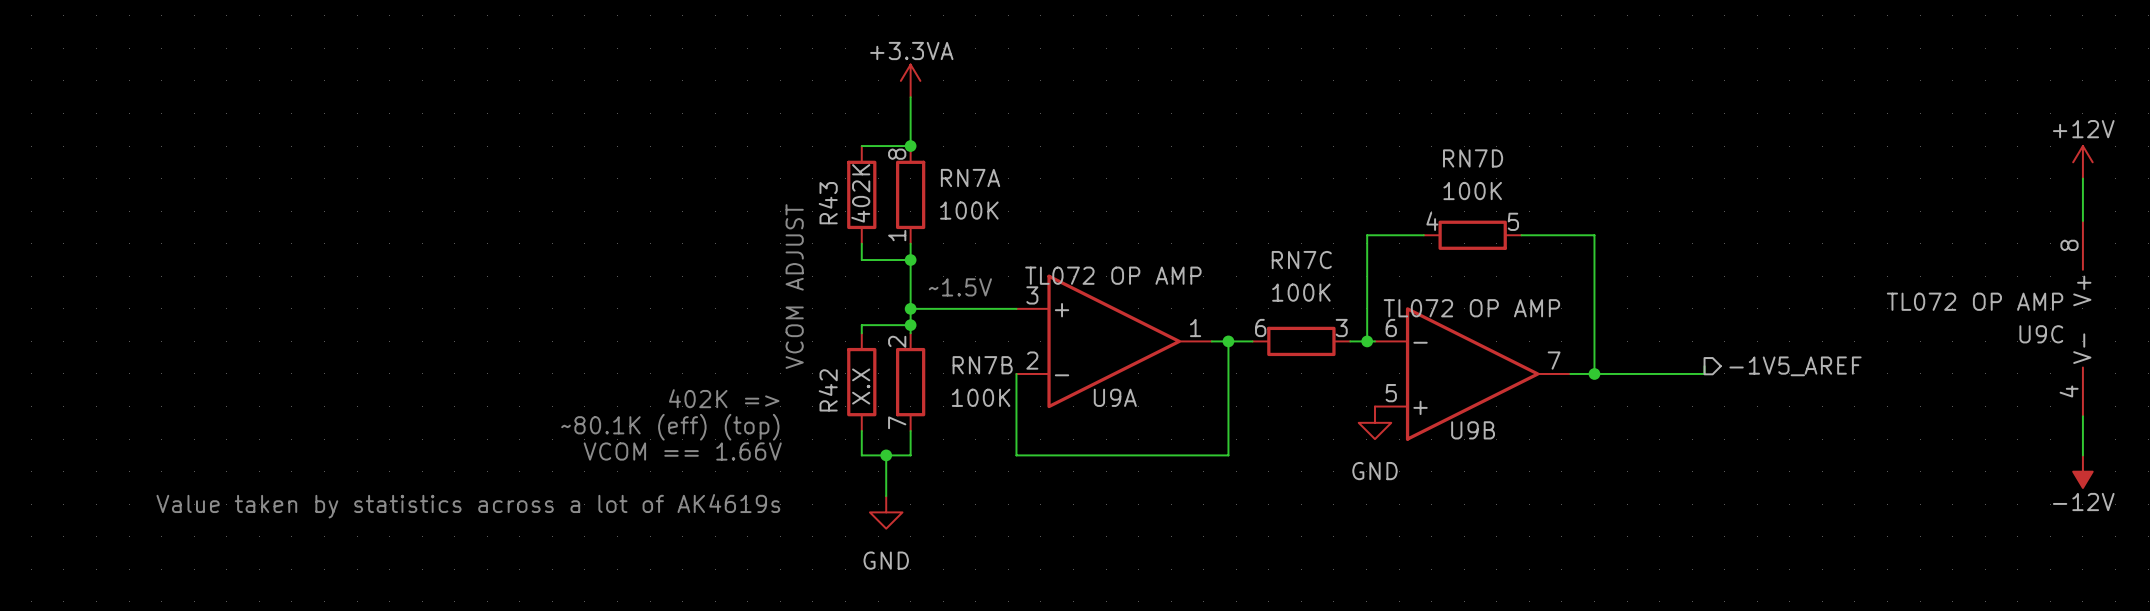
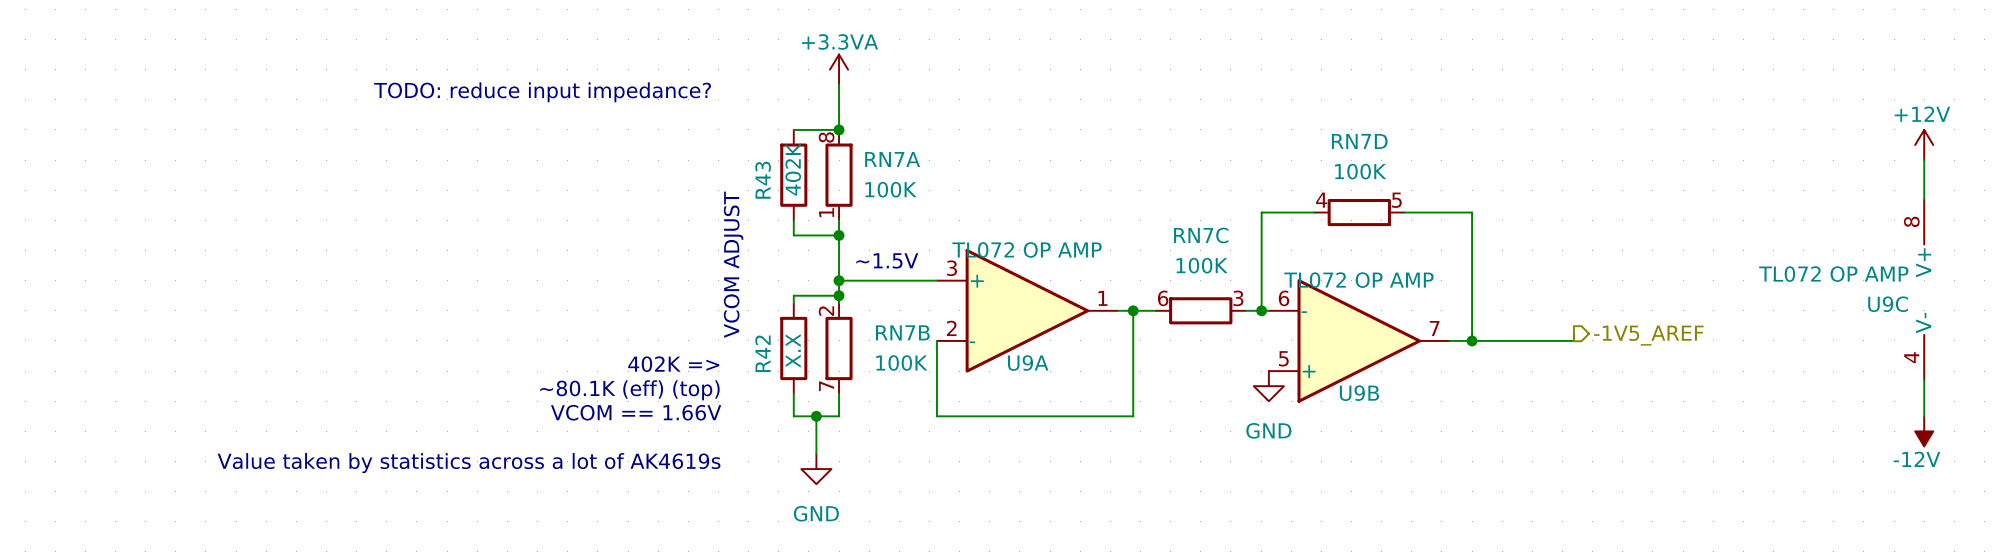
text: none -> TODO: reduce input impedance? (542, 92)

